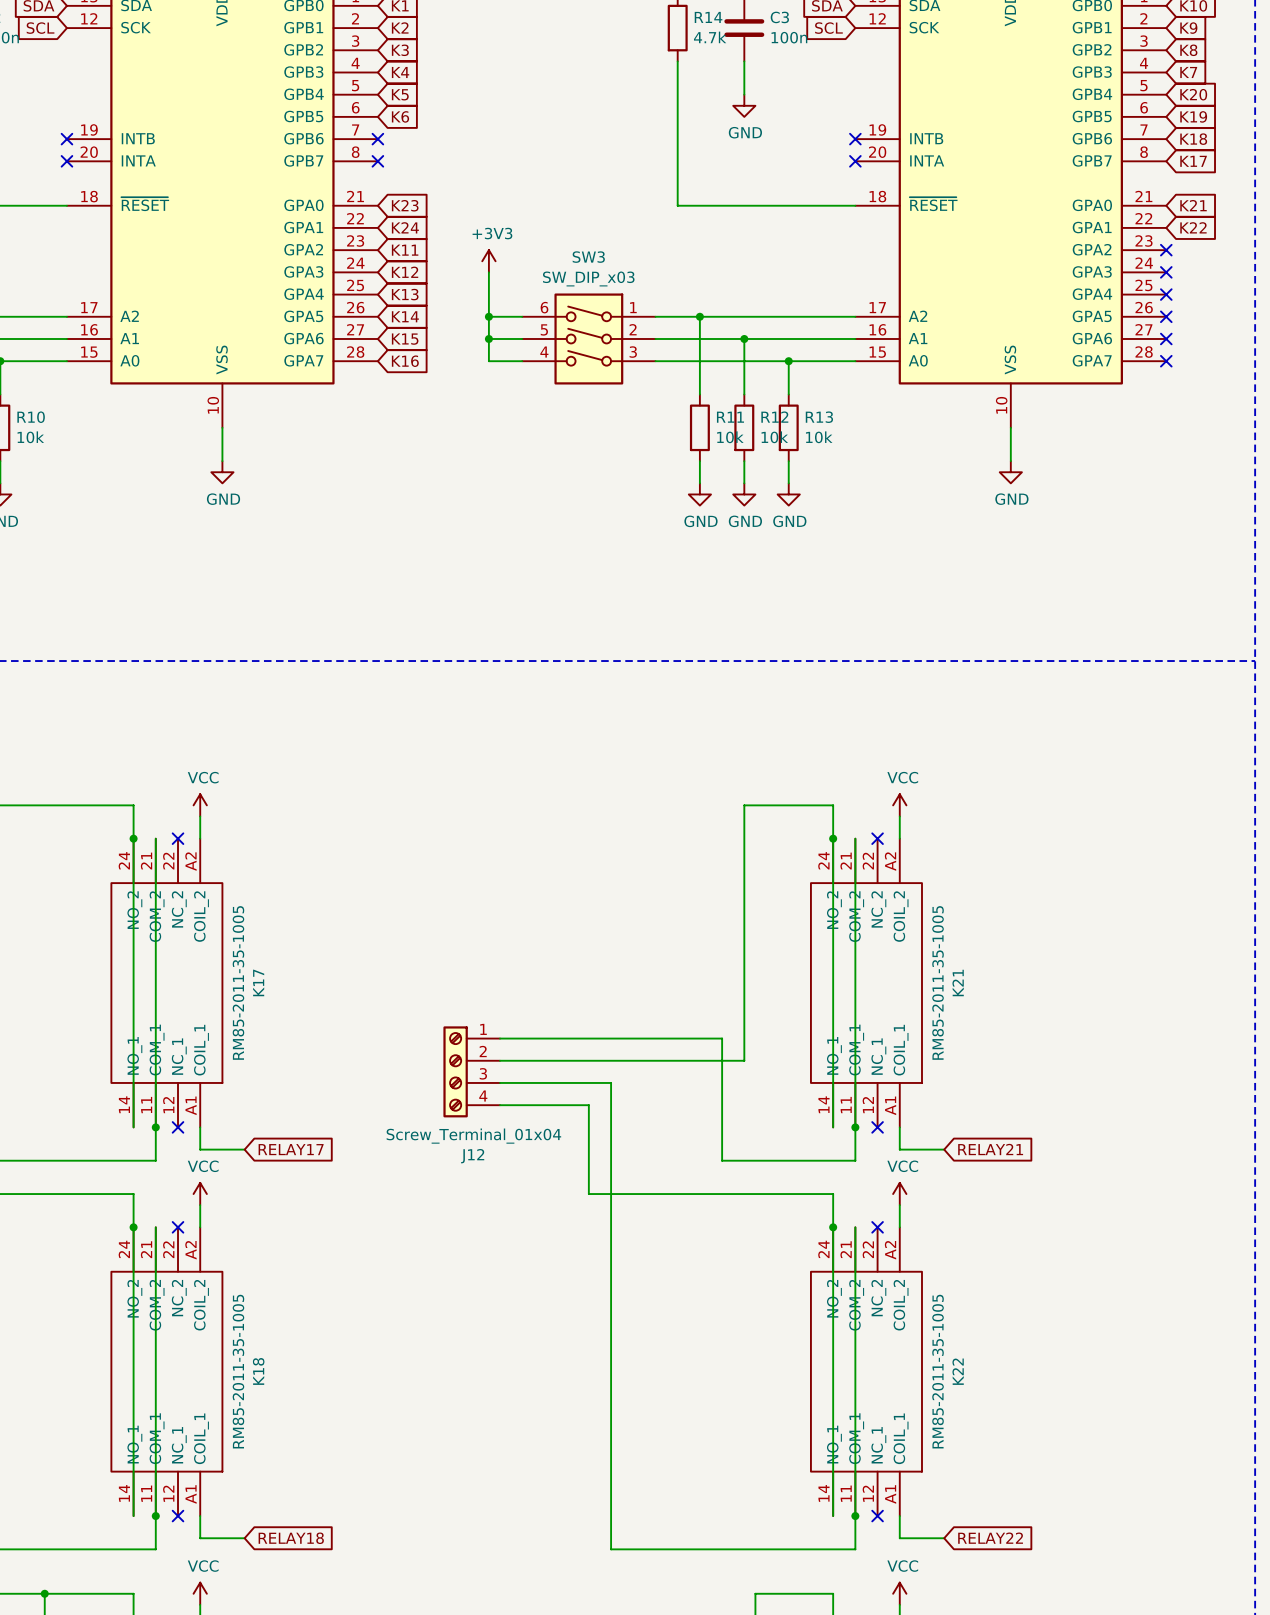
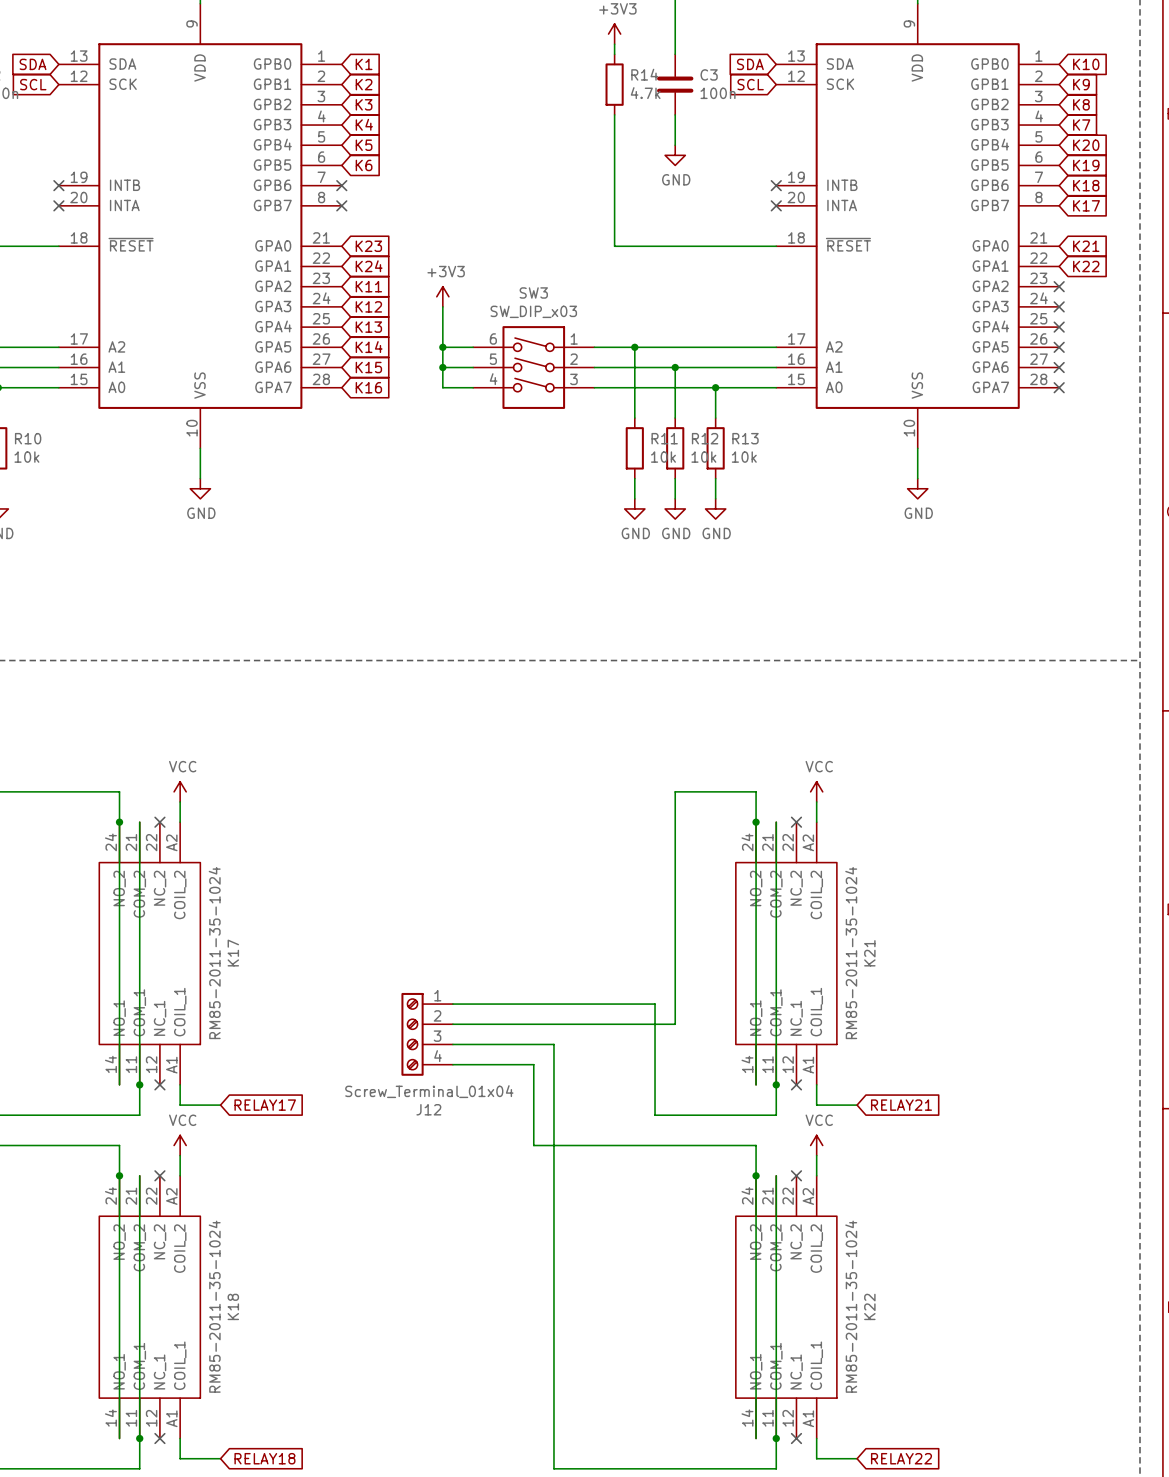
K17 value: RM85-2011-35-1005 (238, 982) -> RM85-2011-35-1024 (214, 953)
K21 value: RM85-2011-35-1005 (938, 982) -> RM85-2011-35-1024 (851, 953)
K18 value: RM85-2011-35-1005 (238, 1371) -> RM85-2011-35-1024 (214, 1306)
K22 value: RM85-2011-35-1005 (938, 1371) -> RM85-2011-35-1024 (851, 1306)

